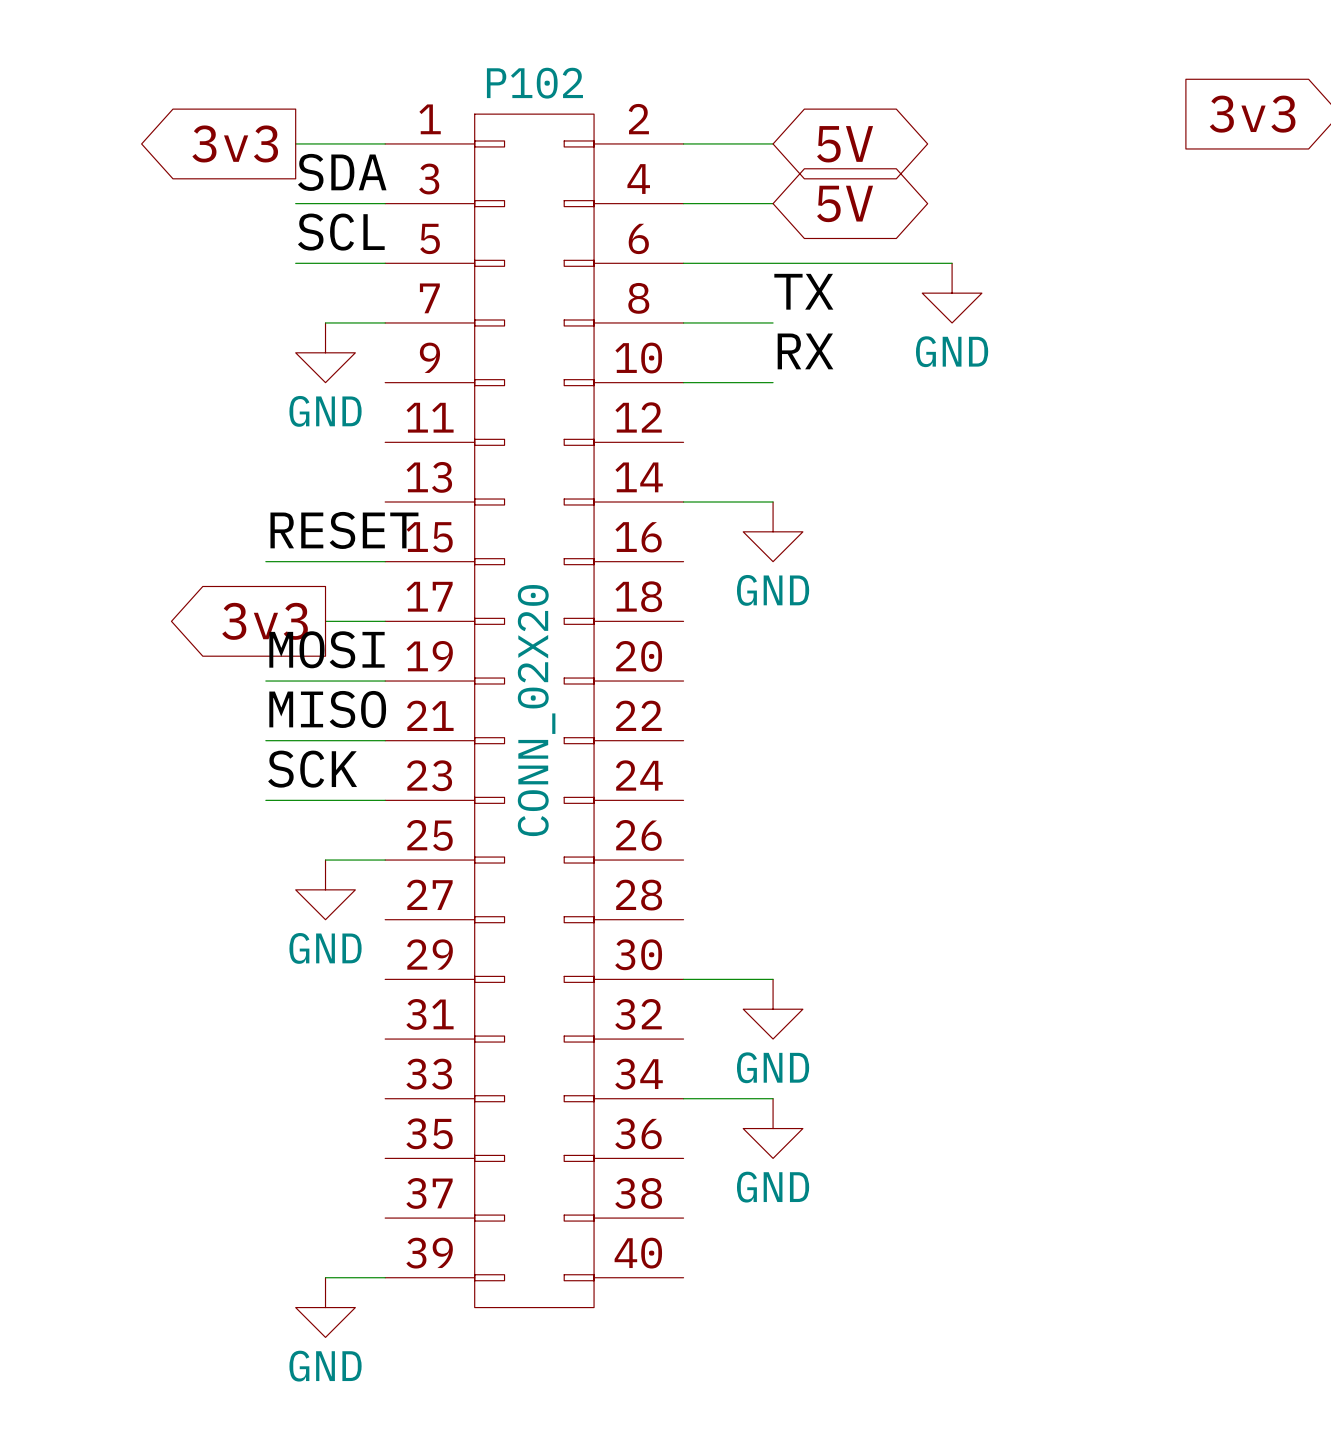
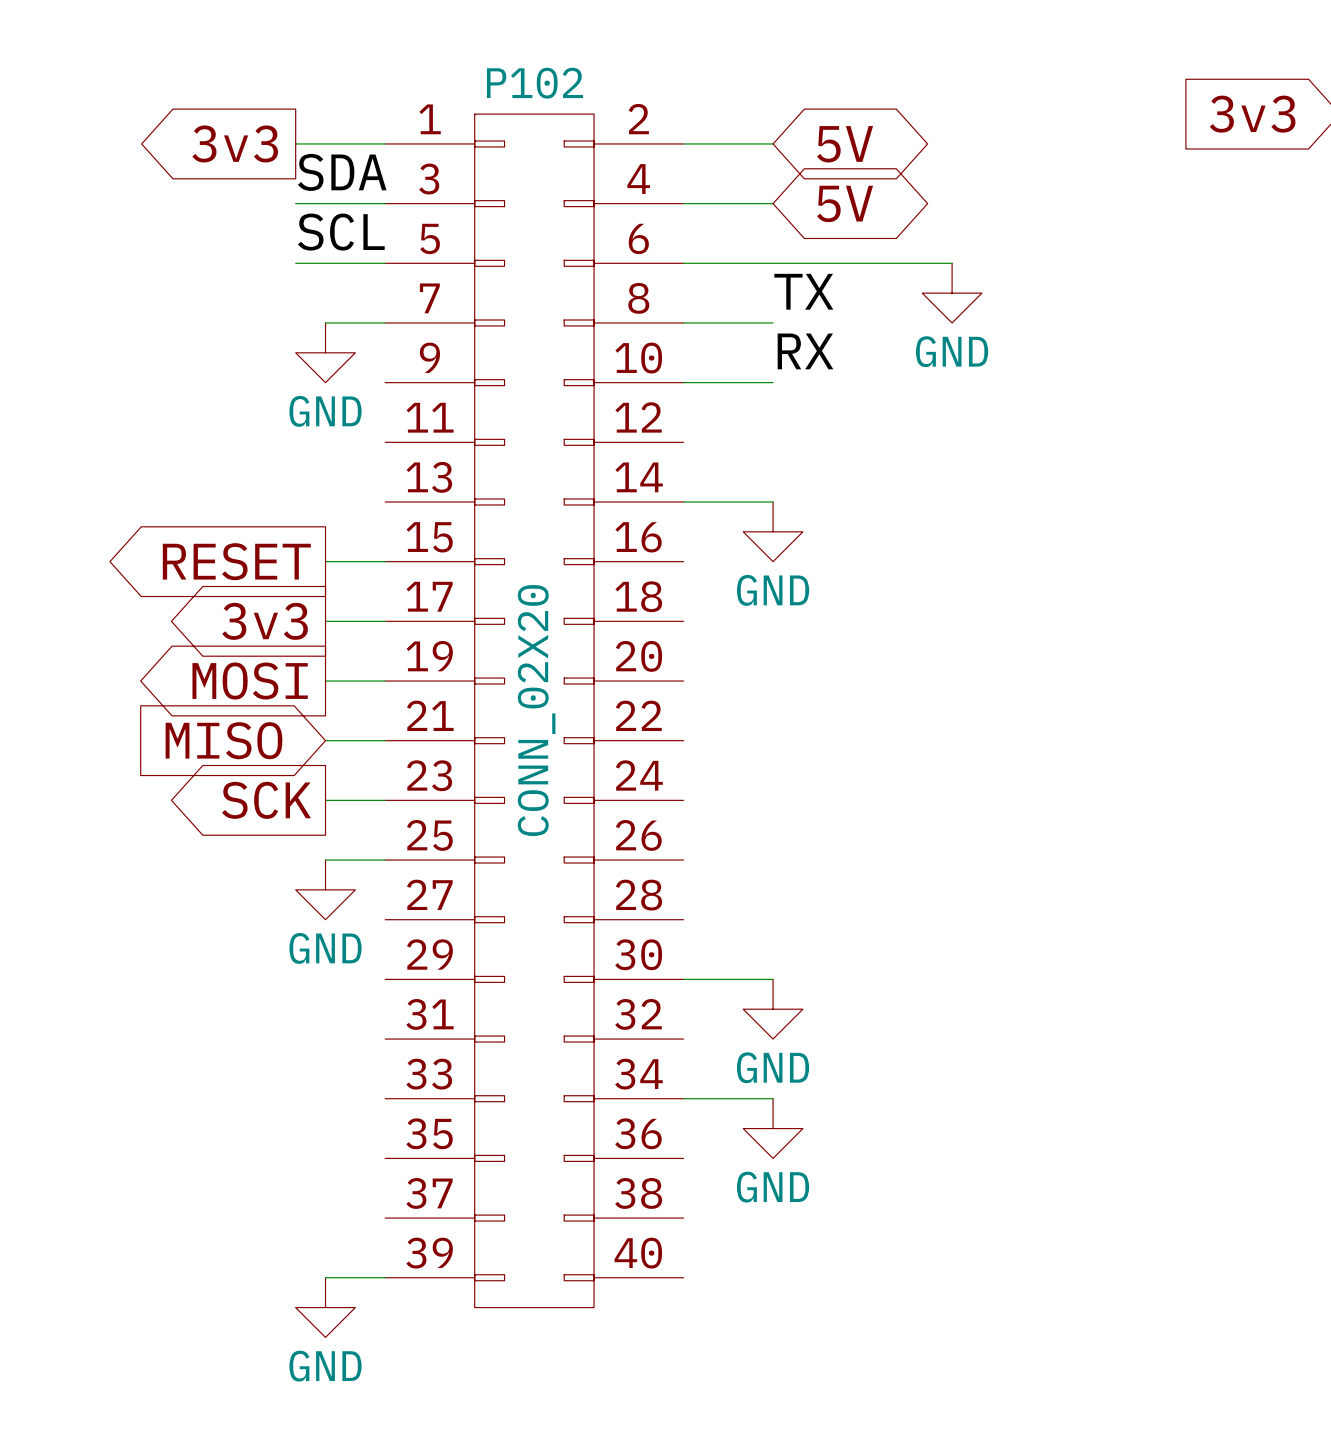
label: RESET (344, 530) -> none
global label: none -> RESET (236, 561)
wire: (265, 561) (325, 561) -> none
label: MOSI (326, 649) -> none
global label: none -> MOSI (250, 681)
wire: (265, 681) (325, 681) -> none
label: MISO (327, 709) -> none
global label: none -> MISO (223, 740)
wire: (265, 740) (325, 740) -> none
label: SCK (312, 769) -> none
wire: (265, 800) (325, 800) -> none
global label: none -> SCK (266, 800)

